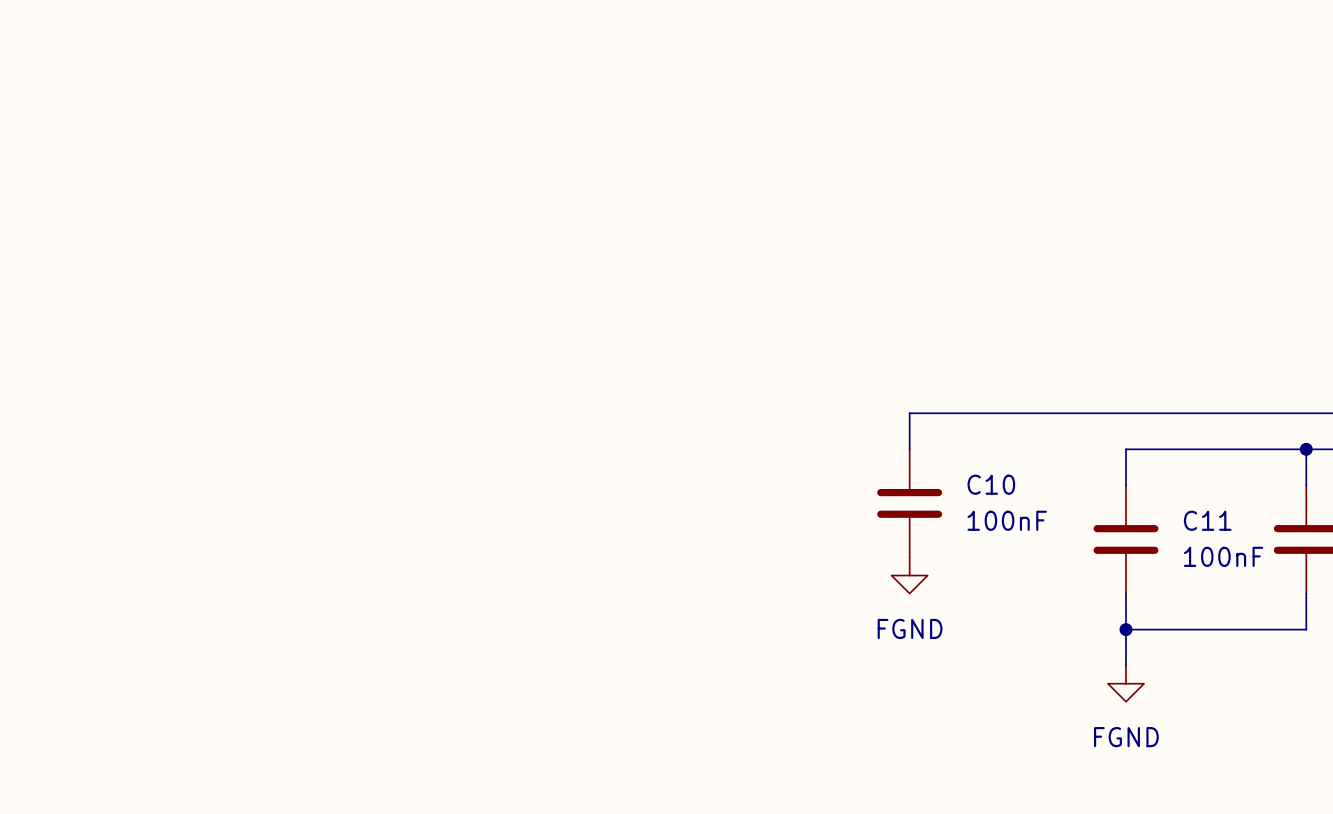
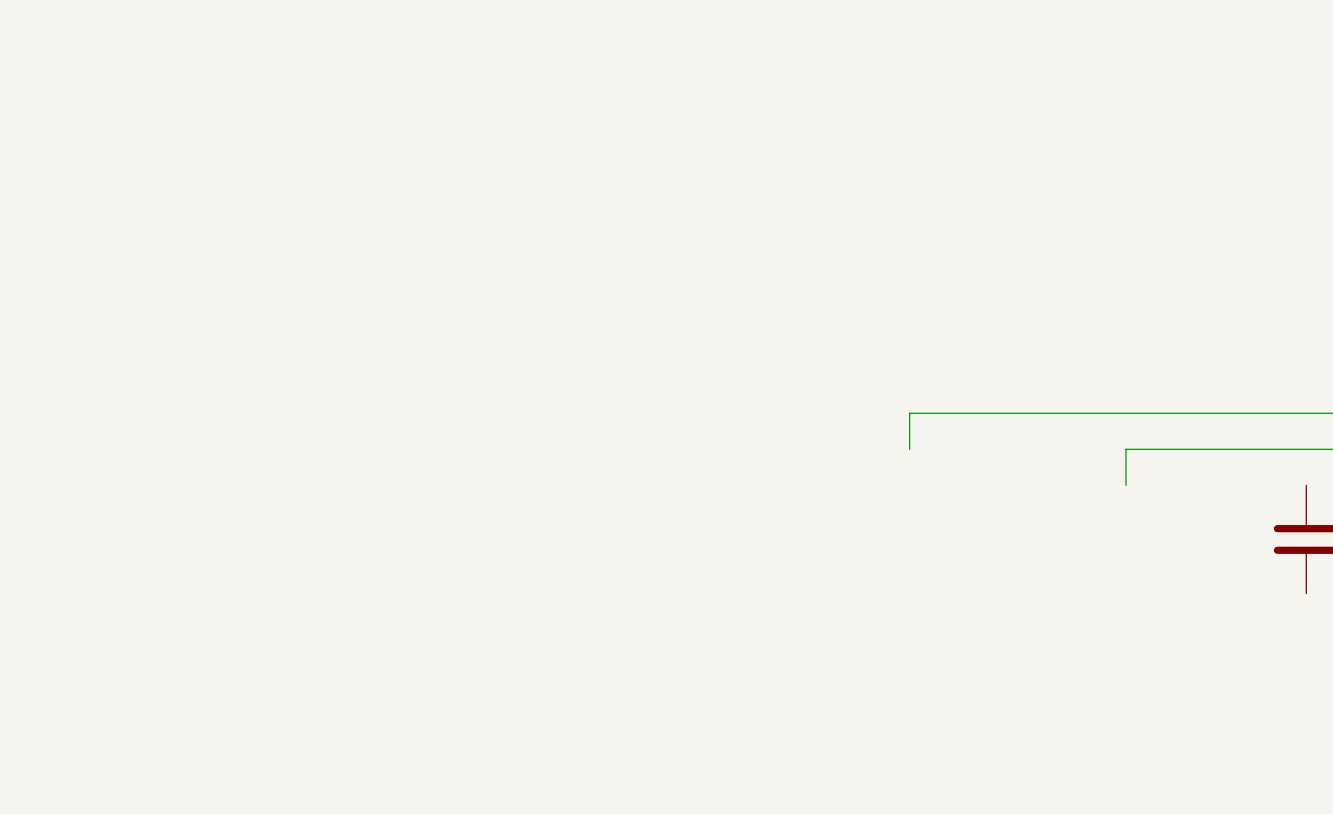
wire: (1306, 449) (1306, 485) -> none
junction: (1306, 449) -> none
C10: 100nF (909, 503) -> none
C11: 100nF (1126, 539) -> none
power symbol: FGND (909, 575) -> none
wire: (1126, 593) (1126, 665) -> none
wire: (1306, 593) (1306, 629) (1126, 629) -> none
junction: (1126, 629) -> none
power symbol: FGND (1126, 683) -> none

